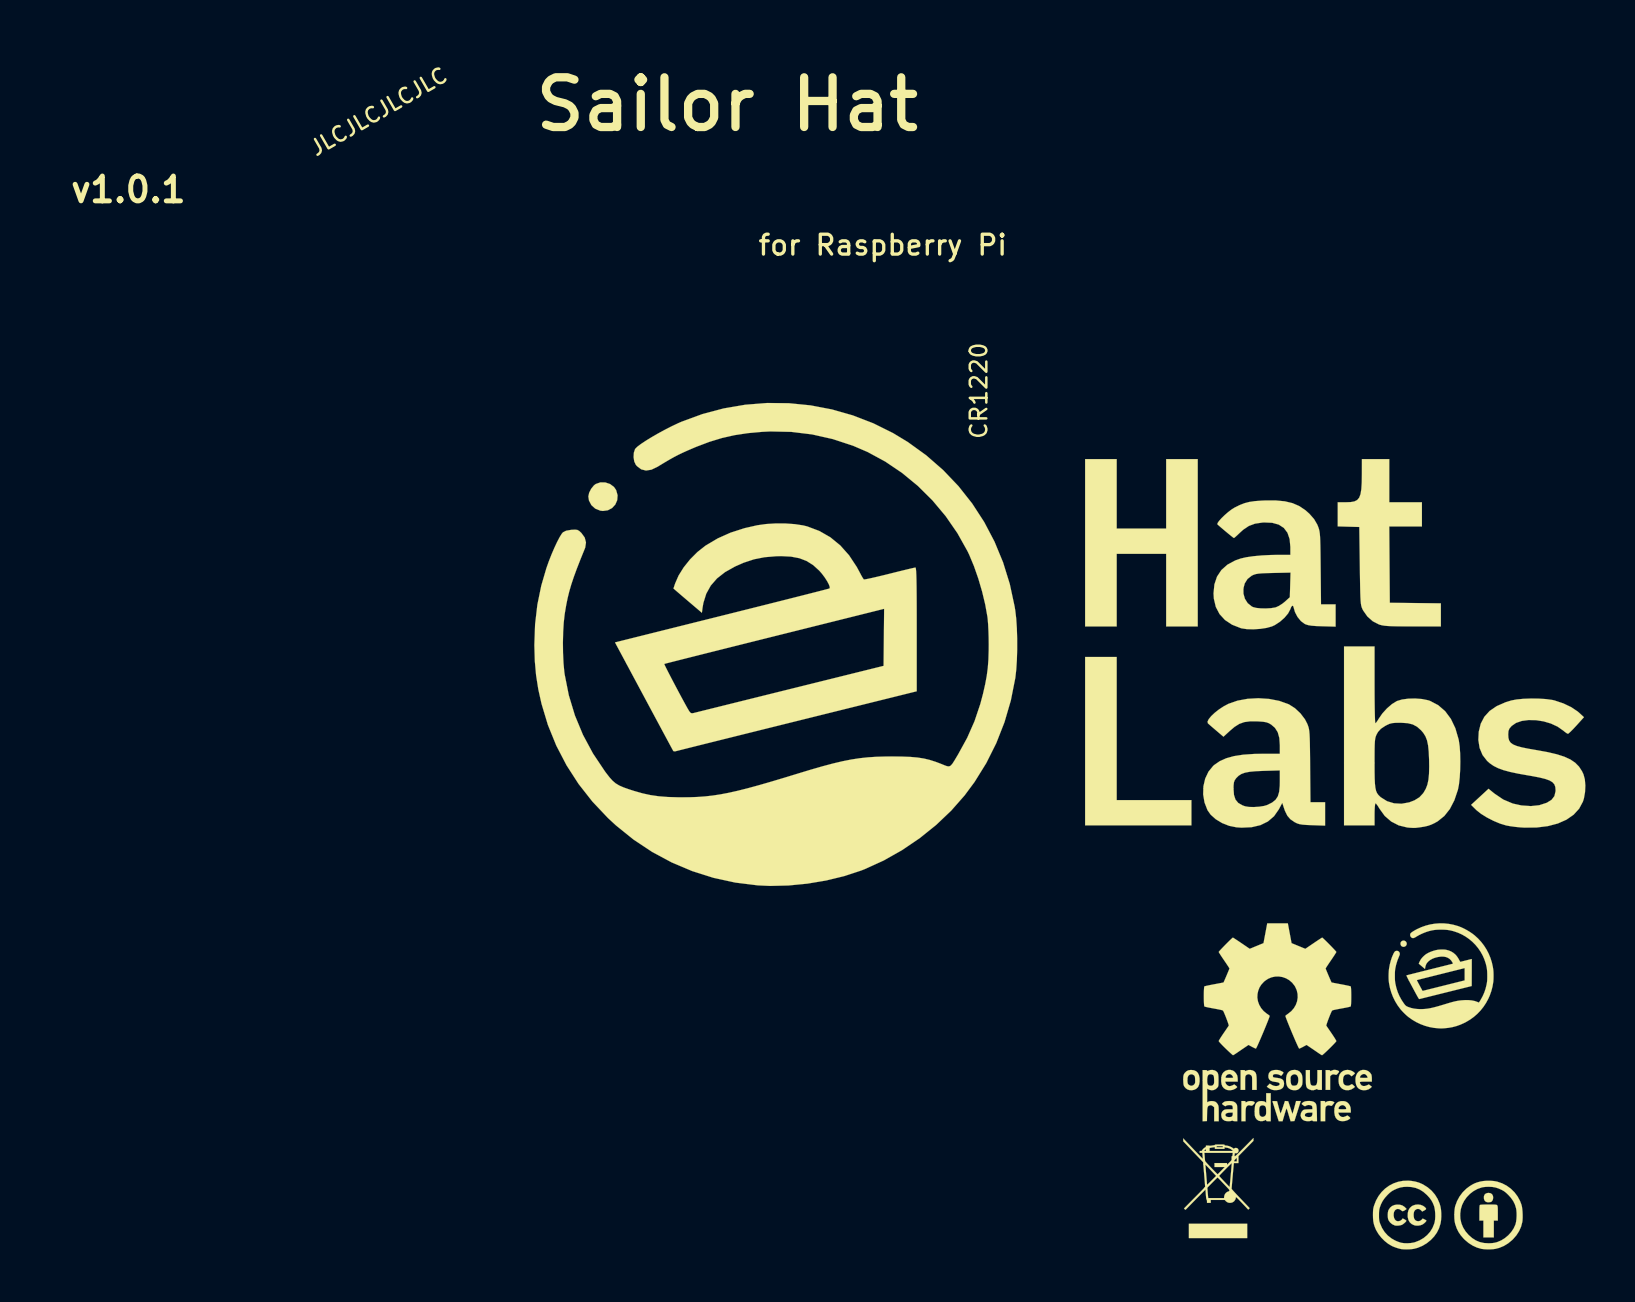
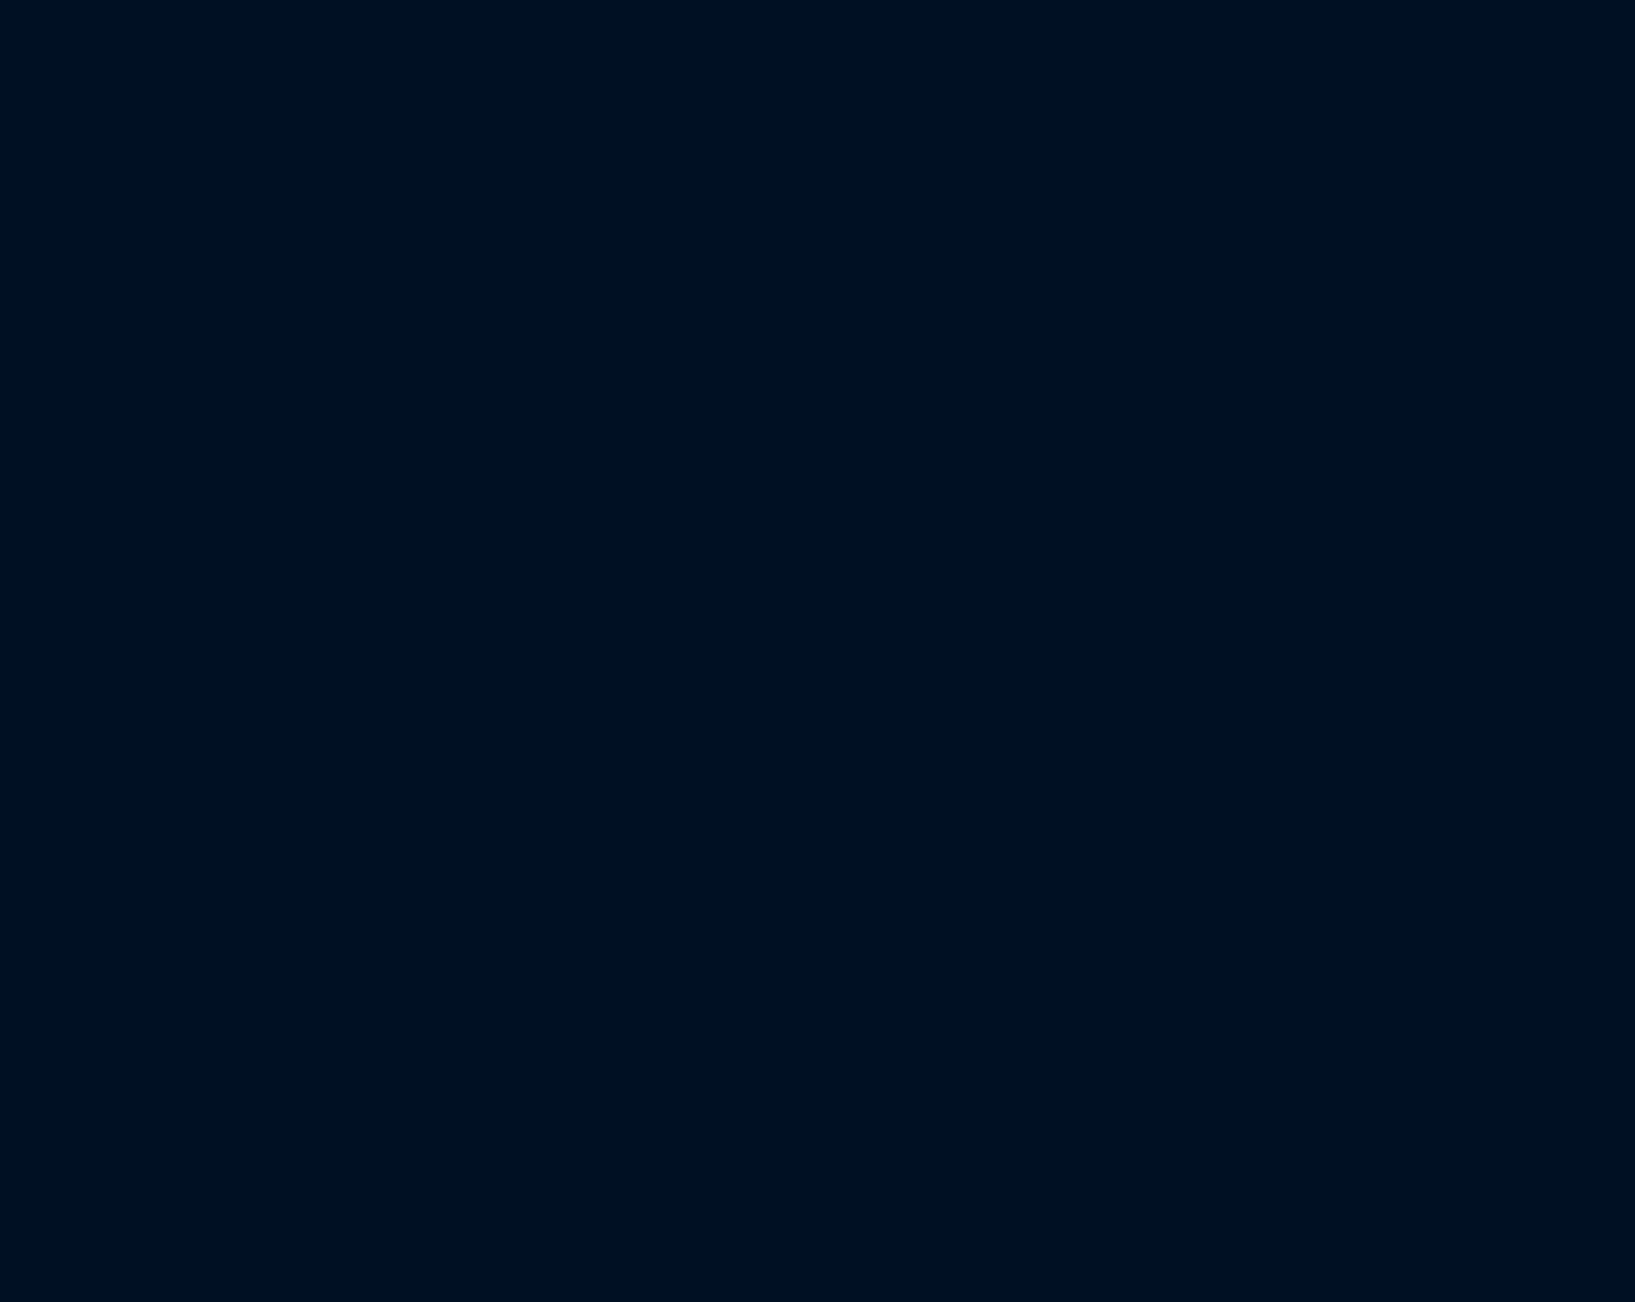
text: Sailor Hat (729, 102) -> none
text: JLCJLCJLCJLC (380, 111) -> none
text: v1.0.1 (127, 188) -> none
text: for Raspberry Pi (881, 247) -> none
text: CR1220 (978, 390) -> none
drawing: [534, 402, 1586, 887] -> none
drawing: [1183, 923, 1494, 1239] -> none
drawing: [1372, 1180, 1523, 1250] -> none

